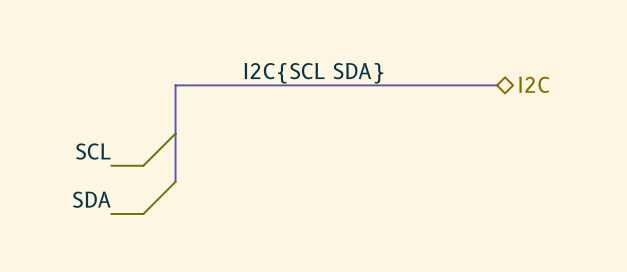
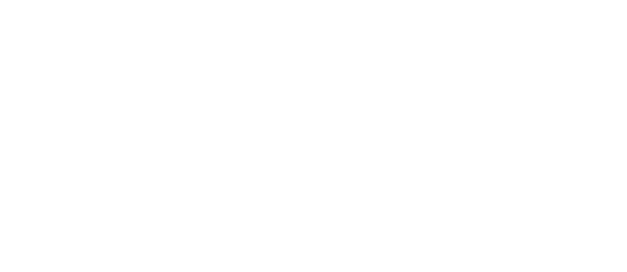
label: I2C{SCL SDA} (313, 73) -> none
hierarchical label: I2C (534, 84) -> none
bus: (497, 85) (175, 85) (175, 181) -> none
wire: (175, 133) (143, 165) (111, 165) -> none
label: SCL (93, 151) -> none
wire: (175, 181) (143, 213) (111, 213) -> none
label: SDA (91, 199) -> none

